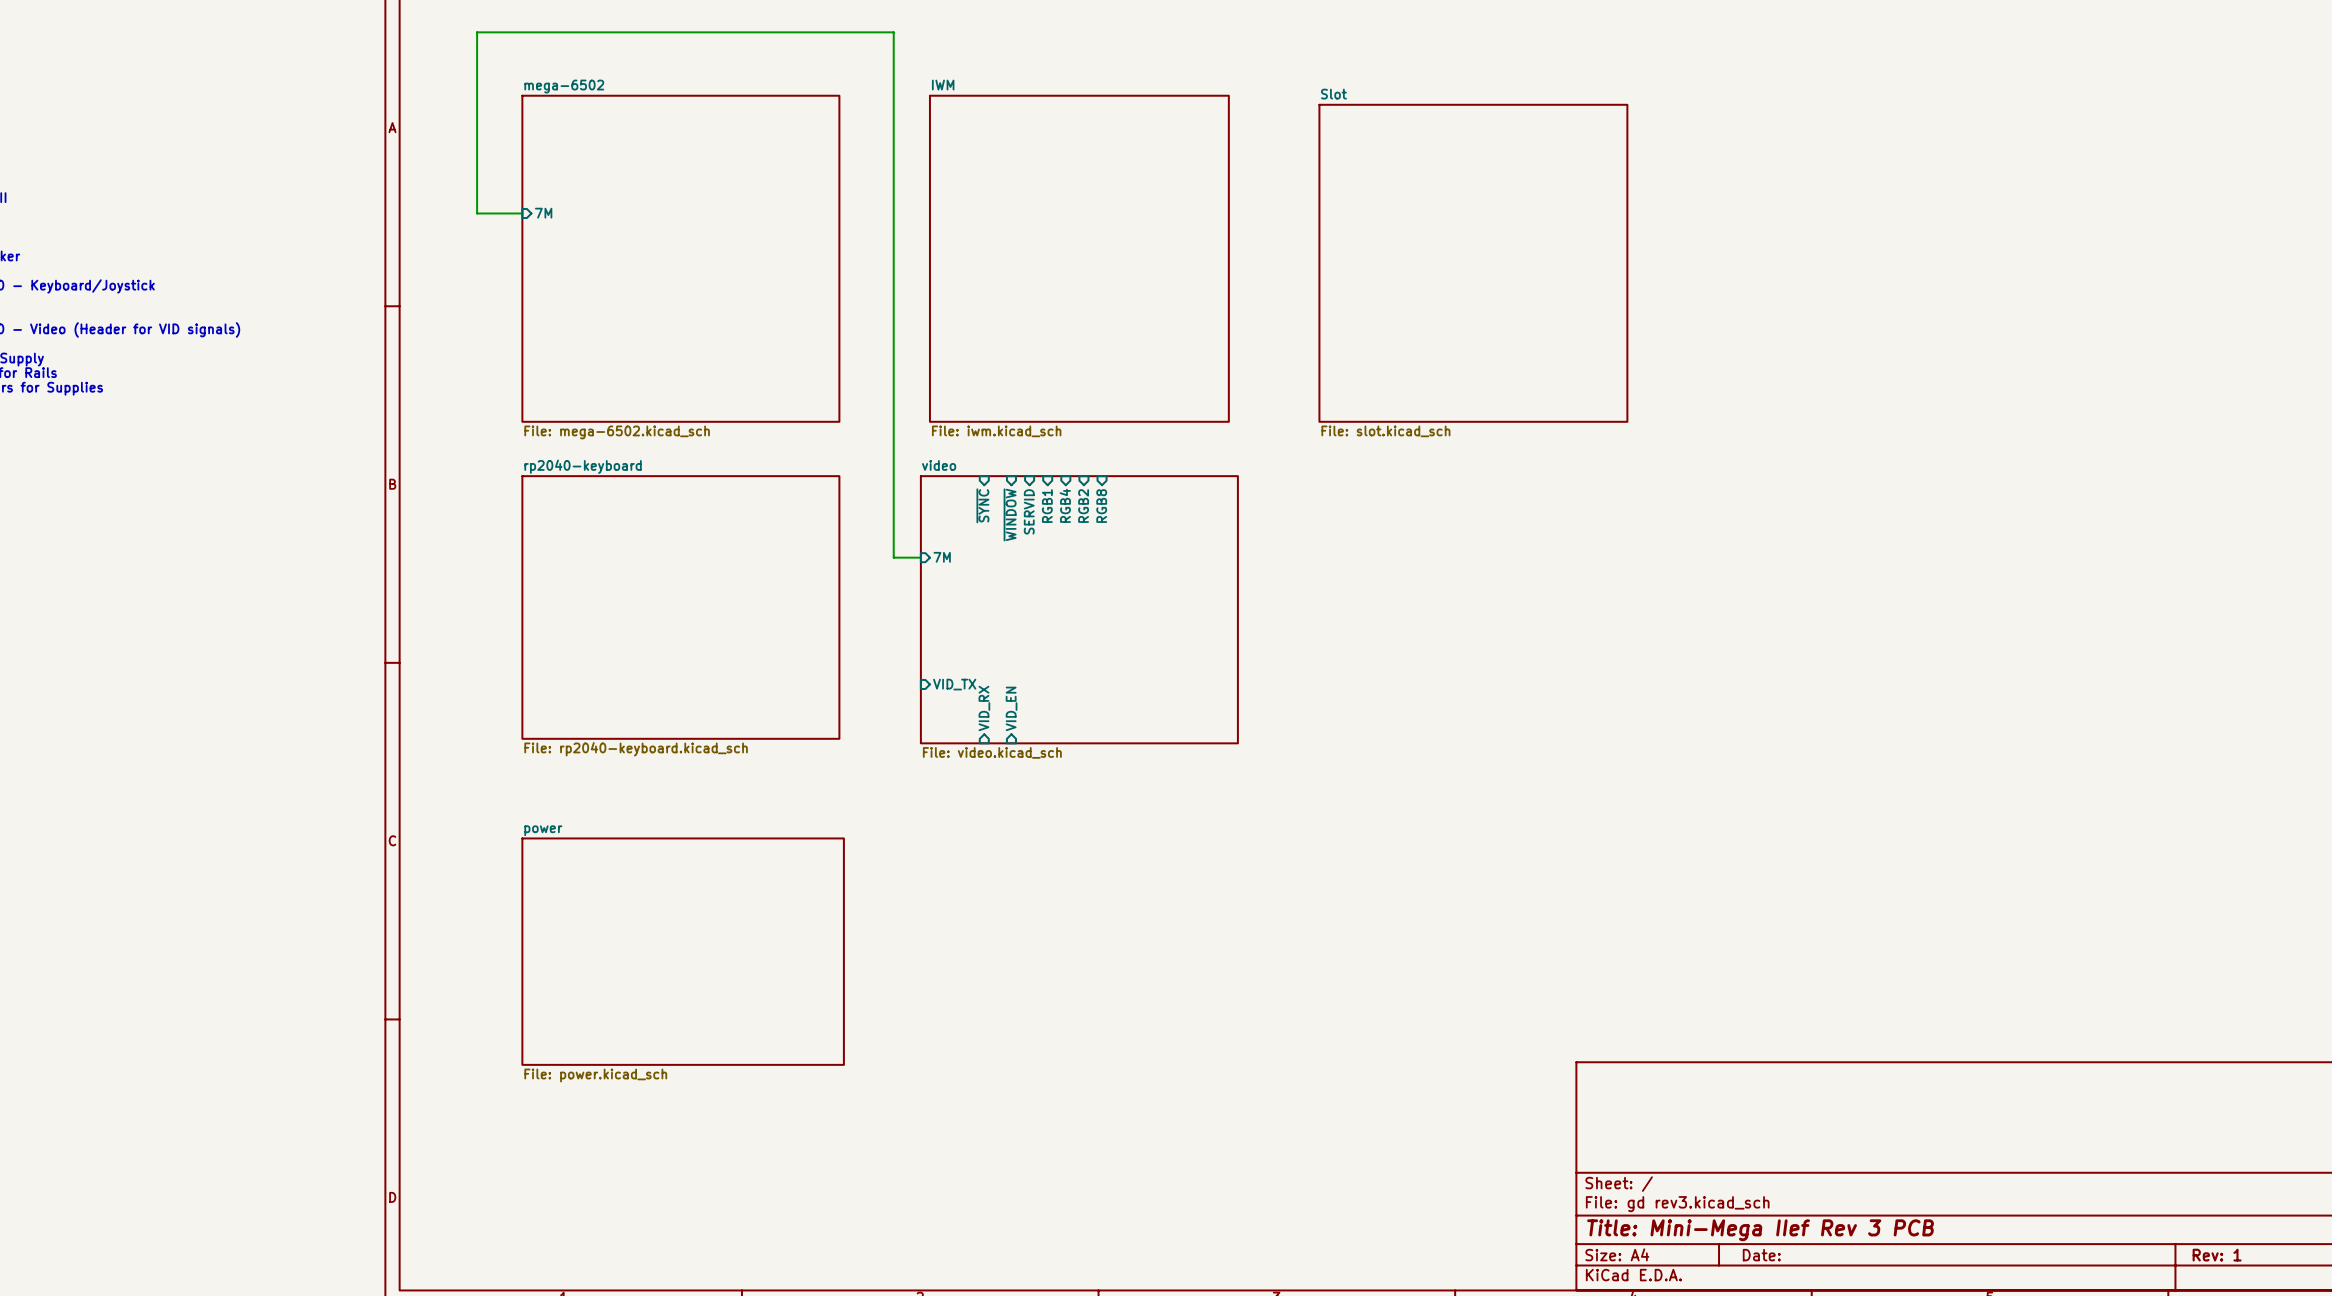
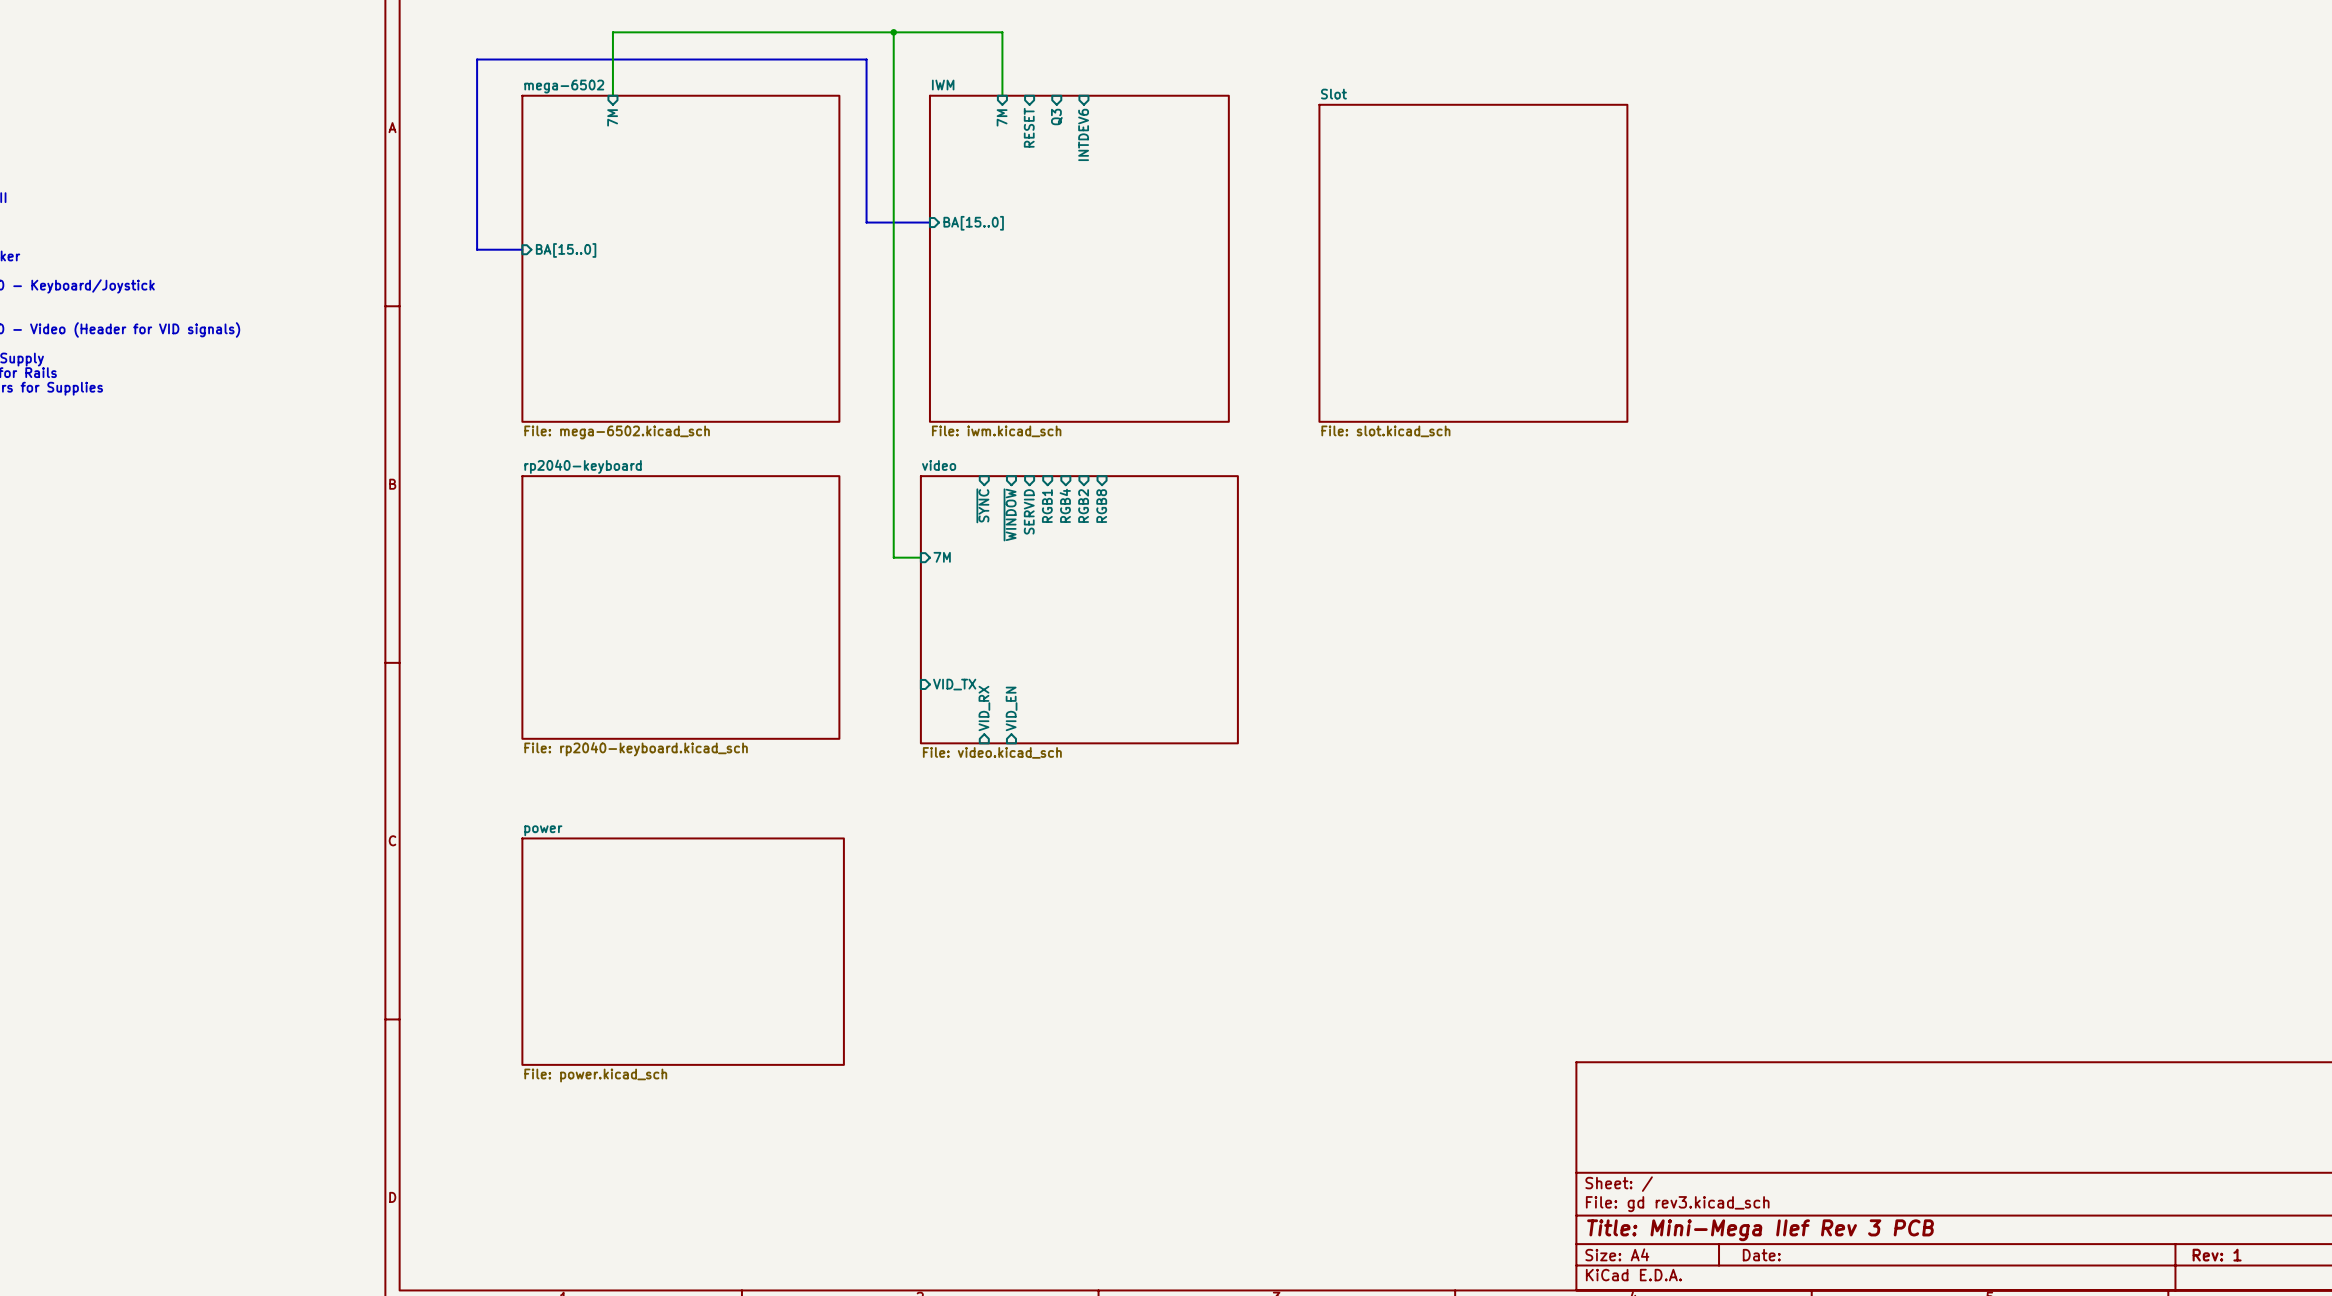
wire: (612, 32) (477, 32) (477, 213) (522, 213) -> (612, 32) (612, 95)
wire: none -> (893, 32) (1002, 32) (1002, 95)
junction: none -> (893, 32)
sheet pin: none -> 7M (1002, 117)
sheet pin: none -> Q3 (1056, 117)
sheet pin: none -> RESET (1029, 127)
sheet pin: none -> INTDEV6 (1083, 134)
sheet pin rotation: 0° (543, 213) -> 90° clockwise (612, 117)
sheet pin position: 7M (543, 213) -> 7M (612, 117)
bus: none -> (929, 222) (866, 222) (866, 59) (477, 59) (477, 249) (522, 249)
sheet pin: none -> BA[15..0] (973, 223)
sheet pin: none -> BA[15..0] (566, 250)

